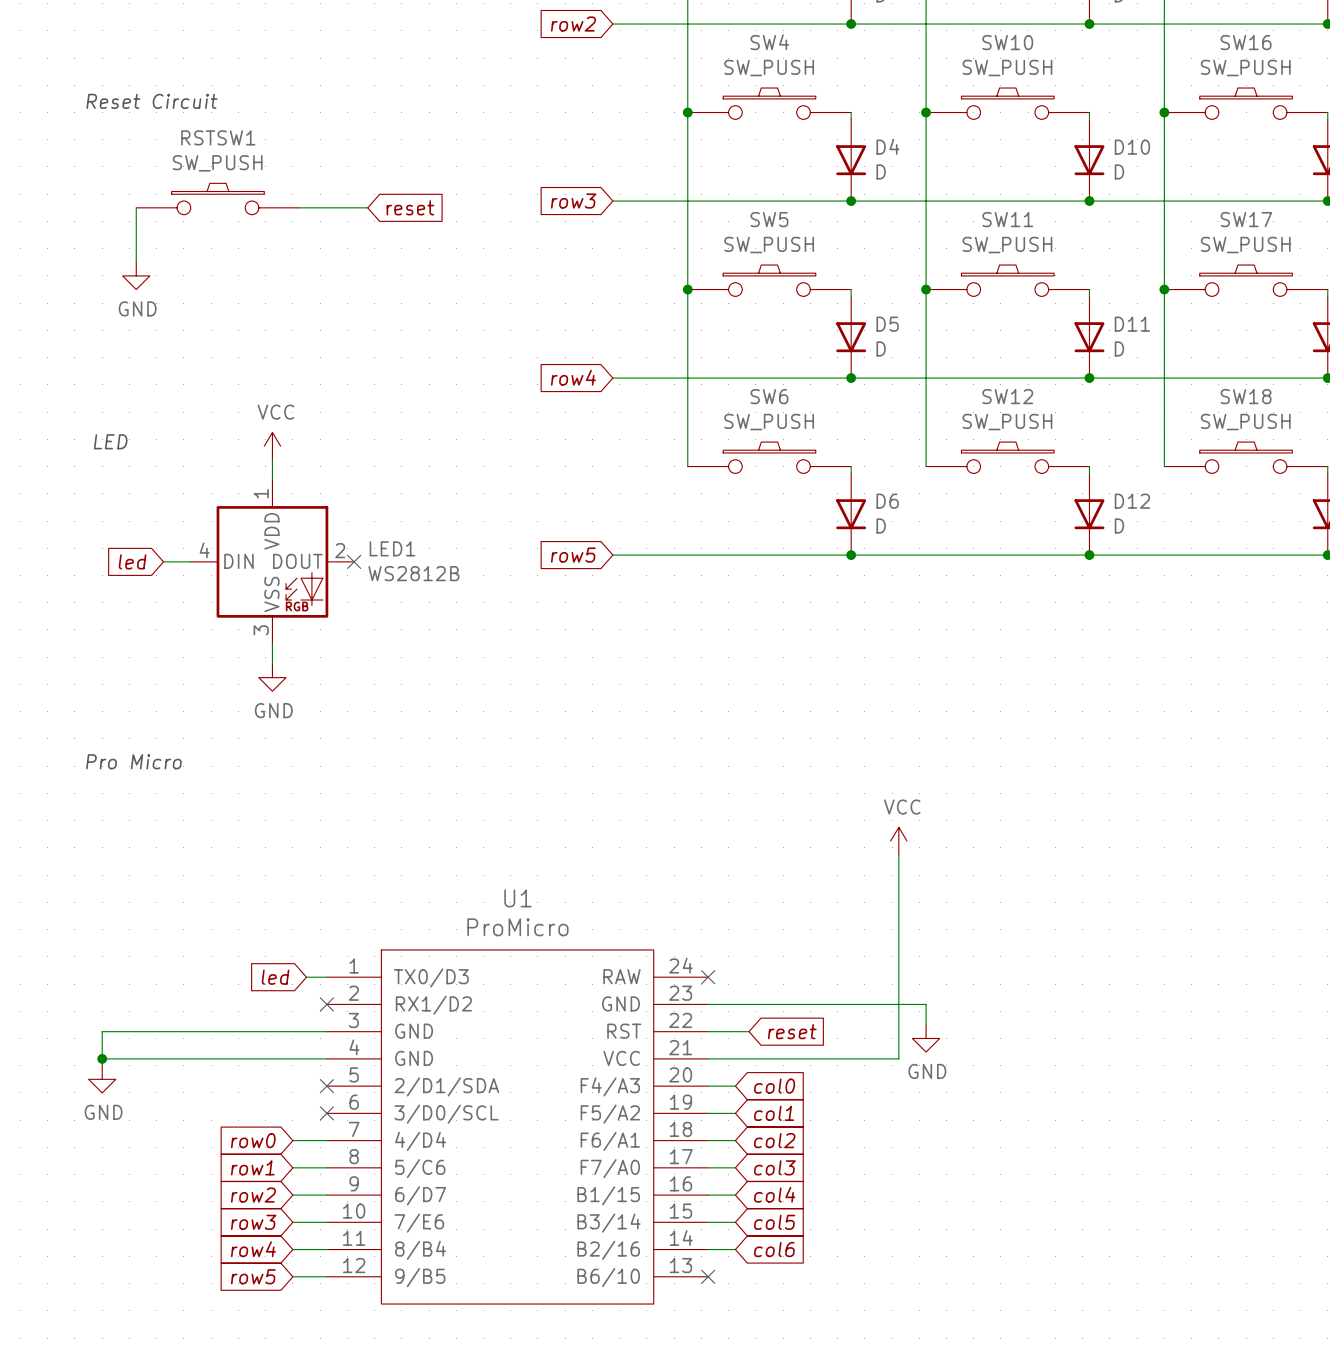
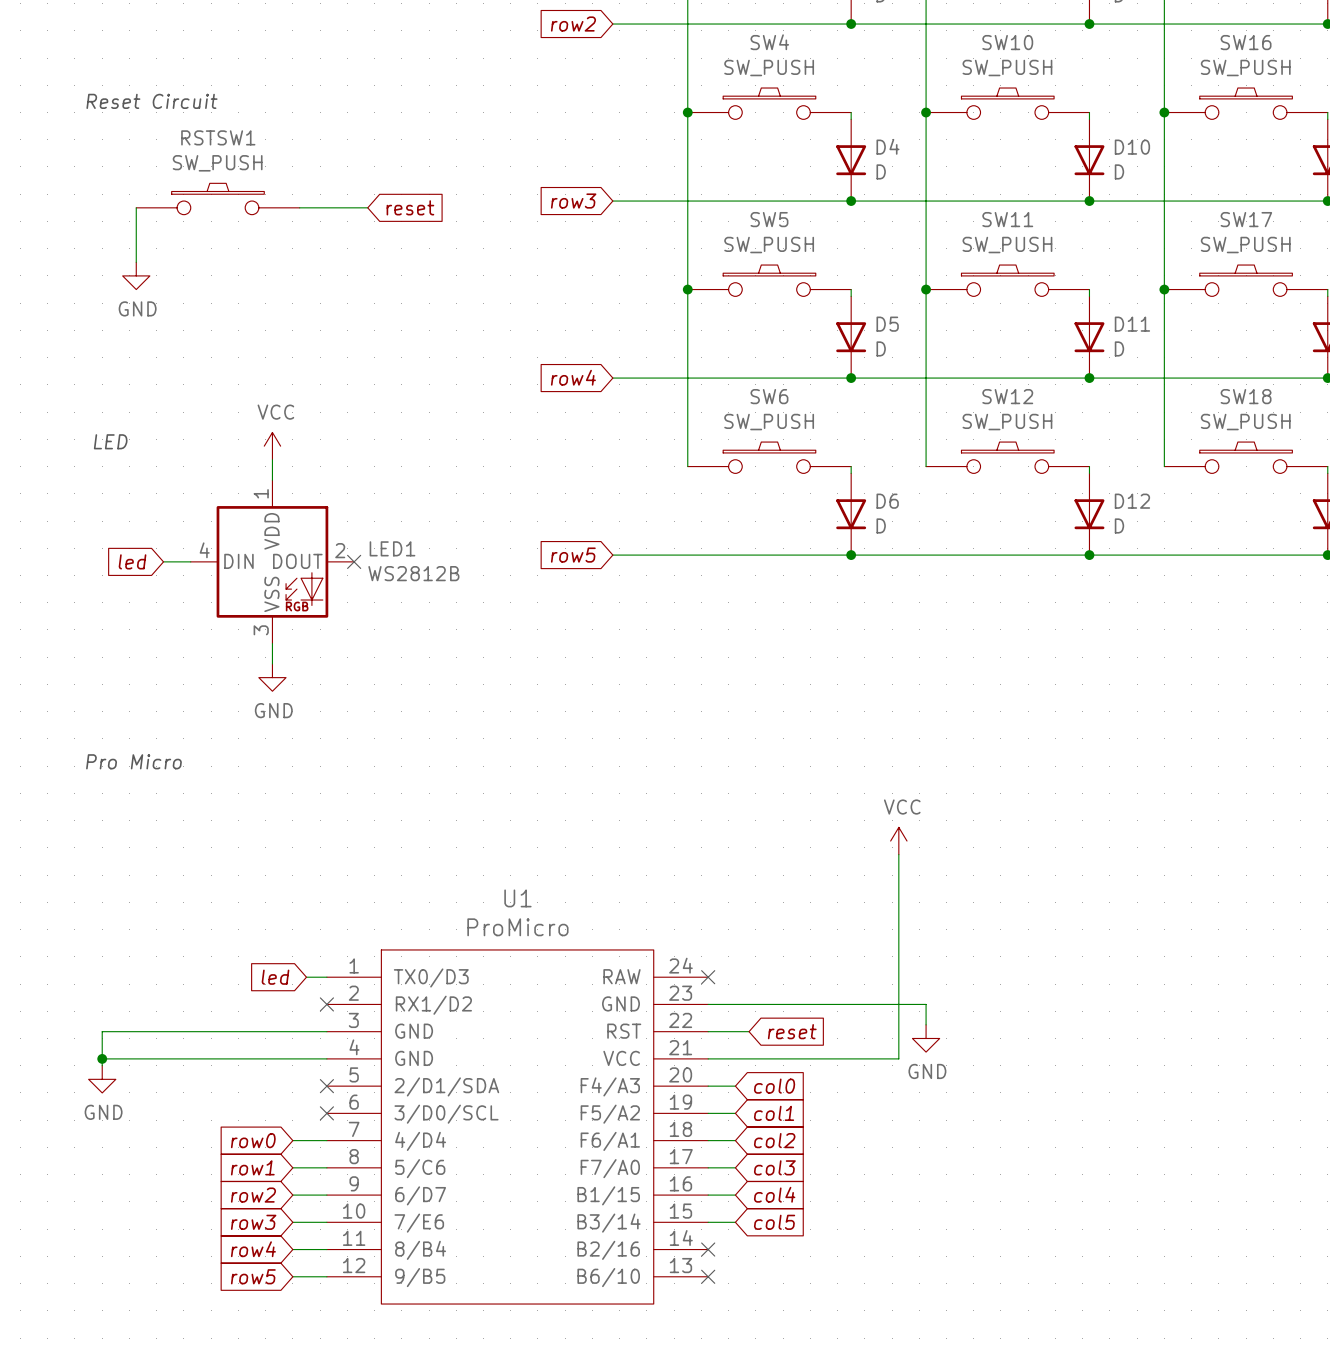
wire: (708, 1249) (735, 1249) -> none
no-connect mark: none -> (708, 1249)
global label: col6 (774, 1249) -> none

